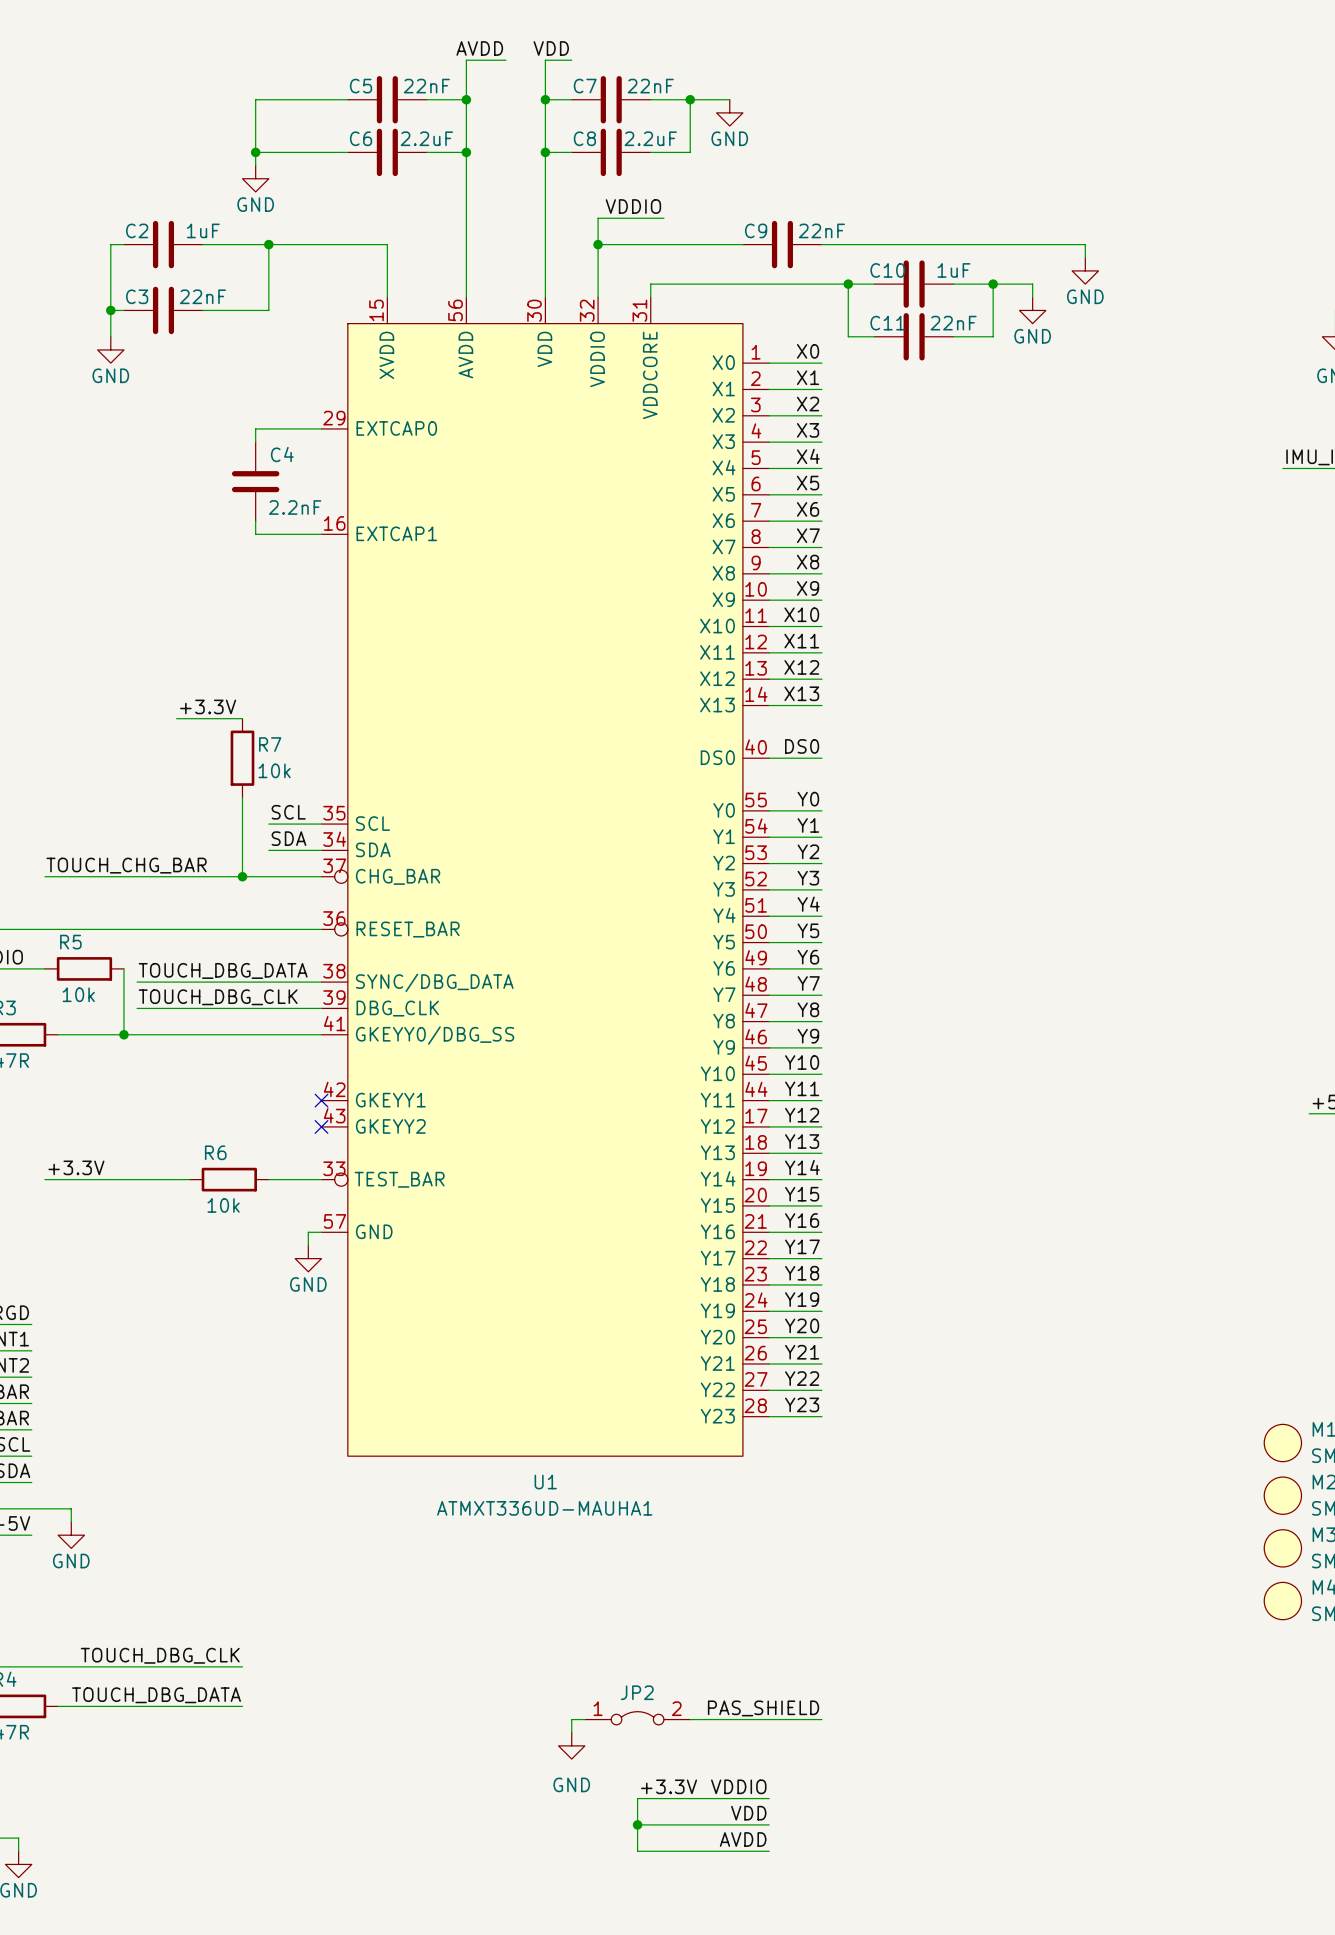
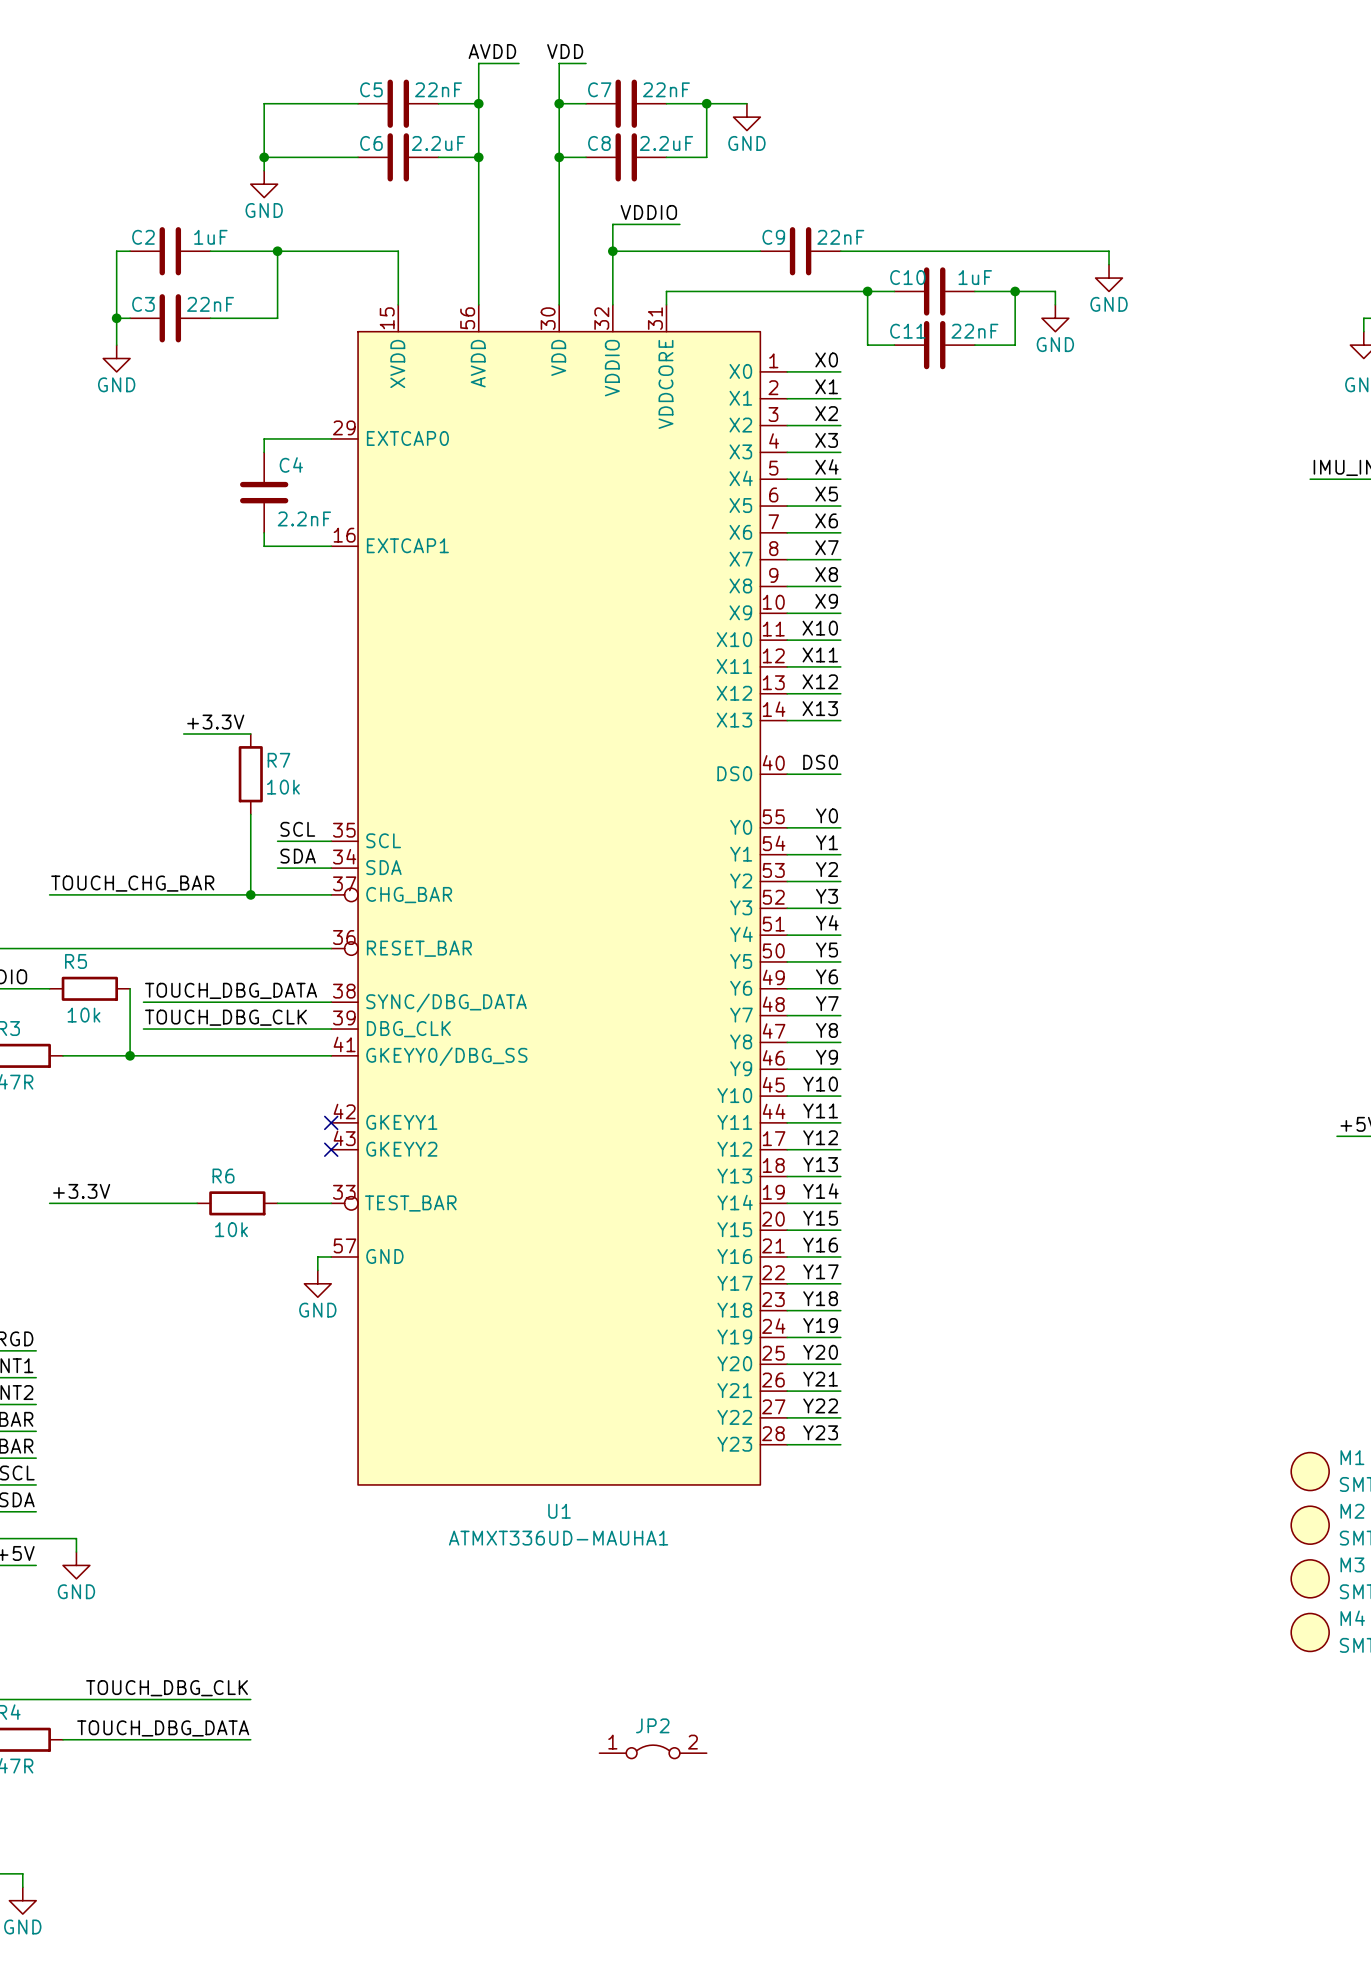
label: PAS_SHIELD (763, 1708) -> none
wire: (584, 1719) (571, 1719) (571, 1732) -> none
wire: (690, 1719) (821, 1719) -> none
power symbol: GND (571, 1745) -> none
label: +3.3V (669, 1786) -> none
label: VDDIO (738, 1786) -> none
wire: (769, 1798) (637, 1798) (637, 1851) (769, 1851) -> none
label: VDD (748, 1813) -> none
wire: (637, 1824) (769, 1824) -> none
junction: (637, 1824) -> none
label: AVDD (743, 1839) -> none

